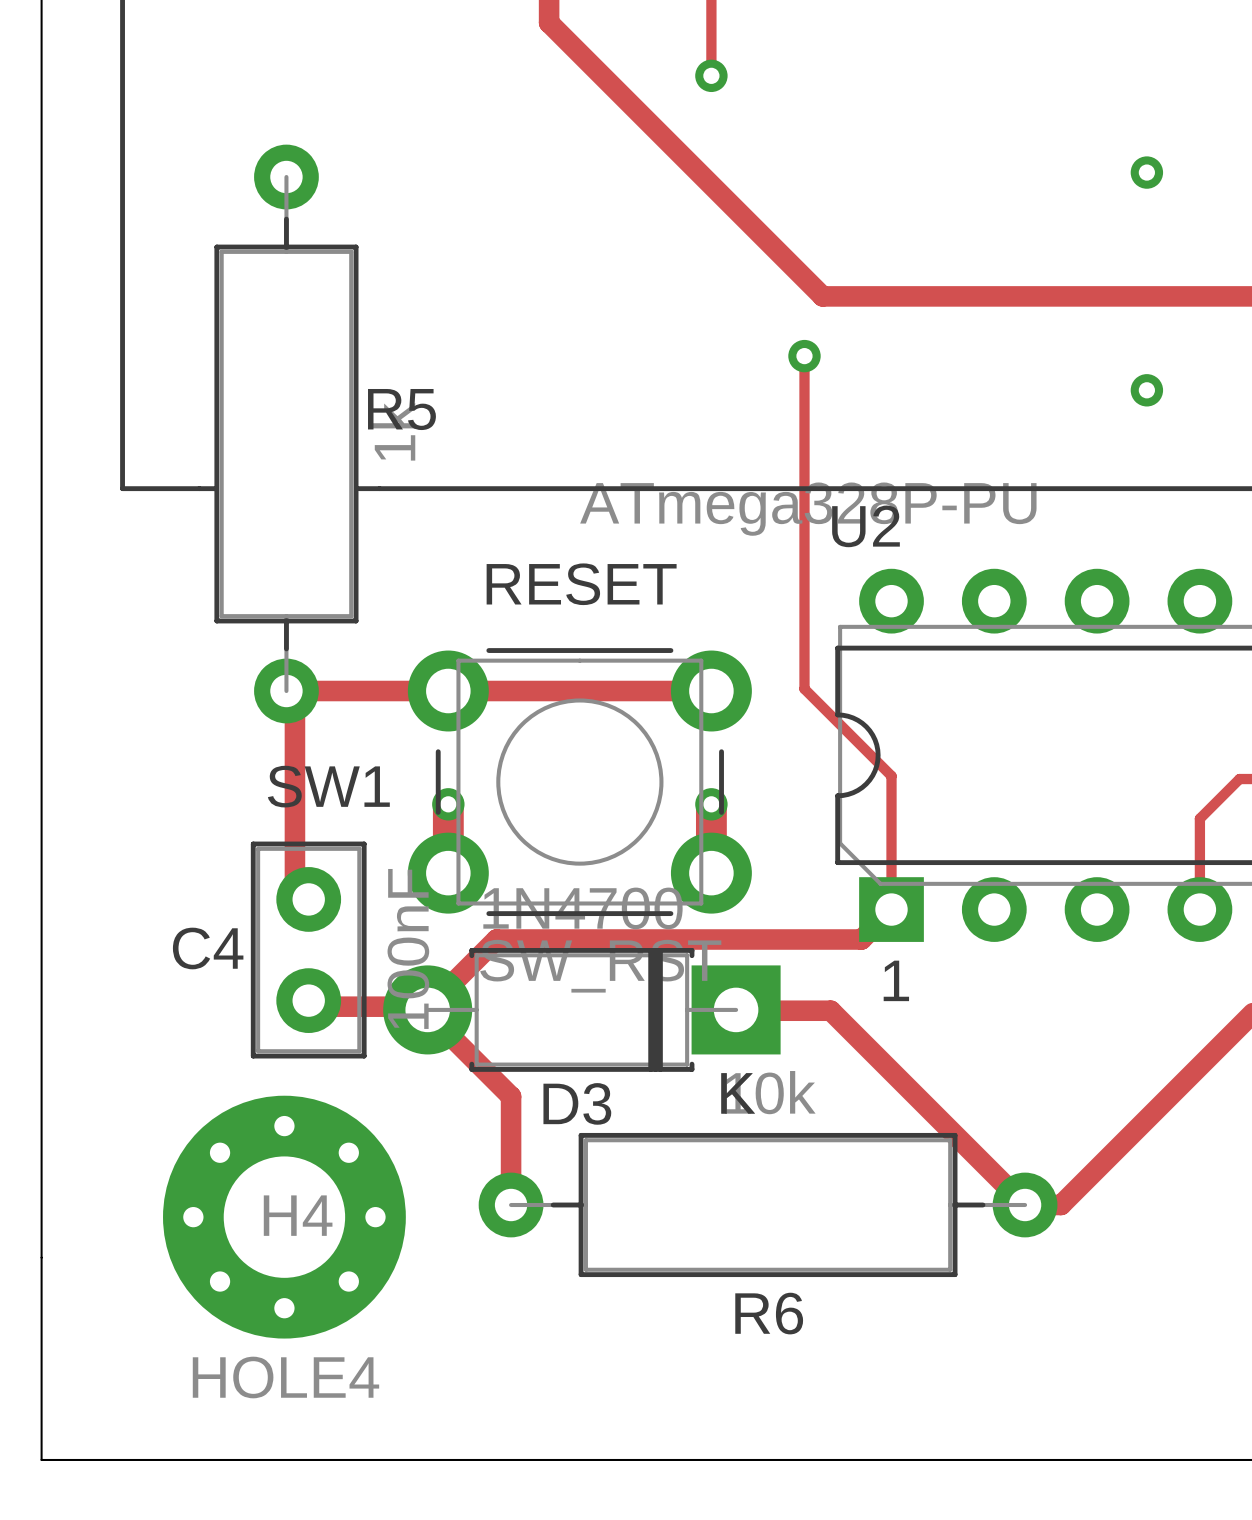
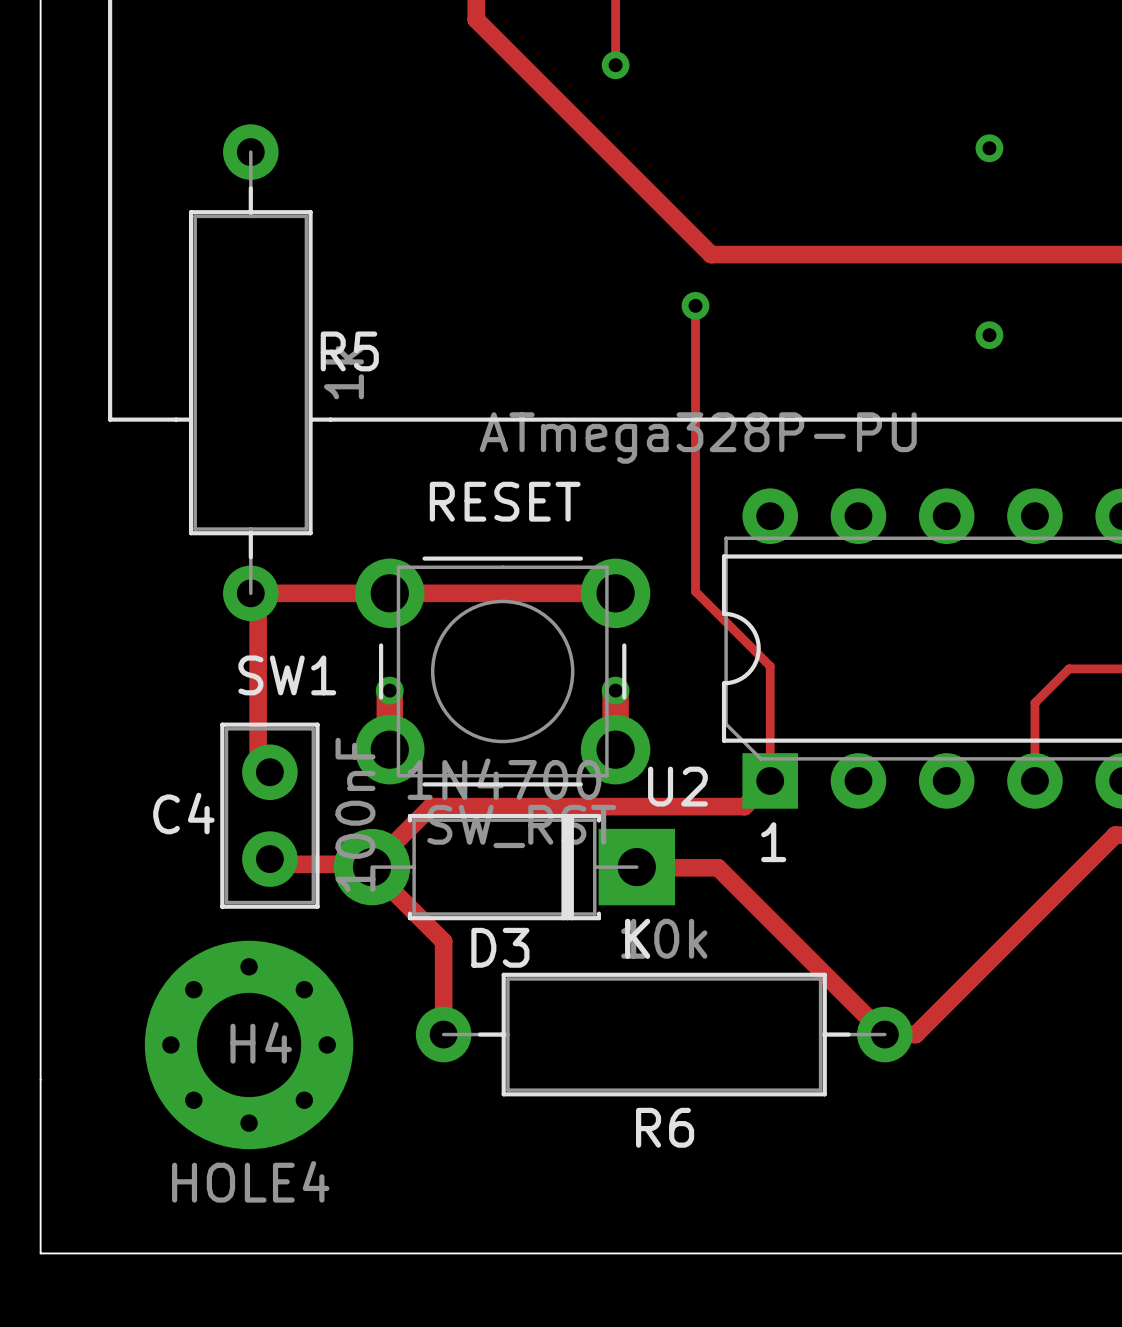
U2 name position: U2 (865, 526) -> U2 (677, 786)

